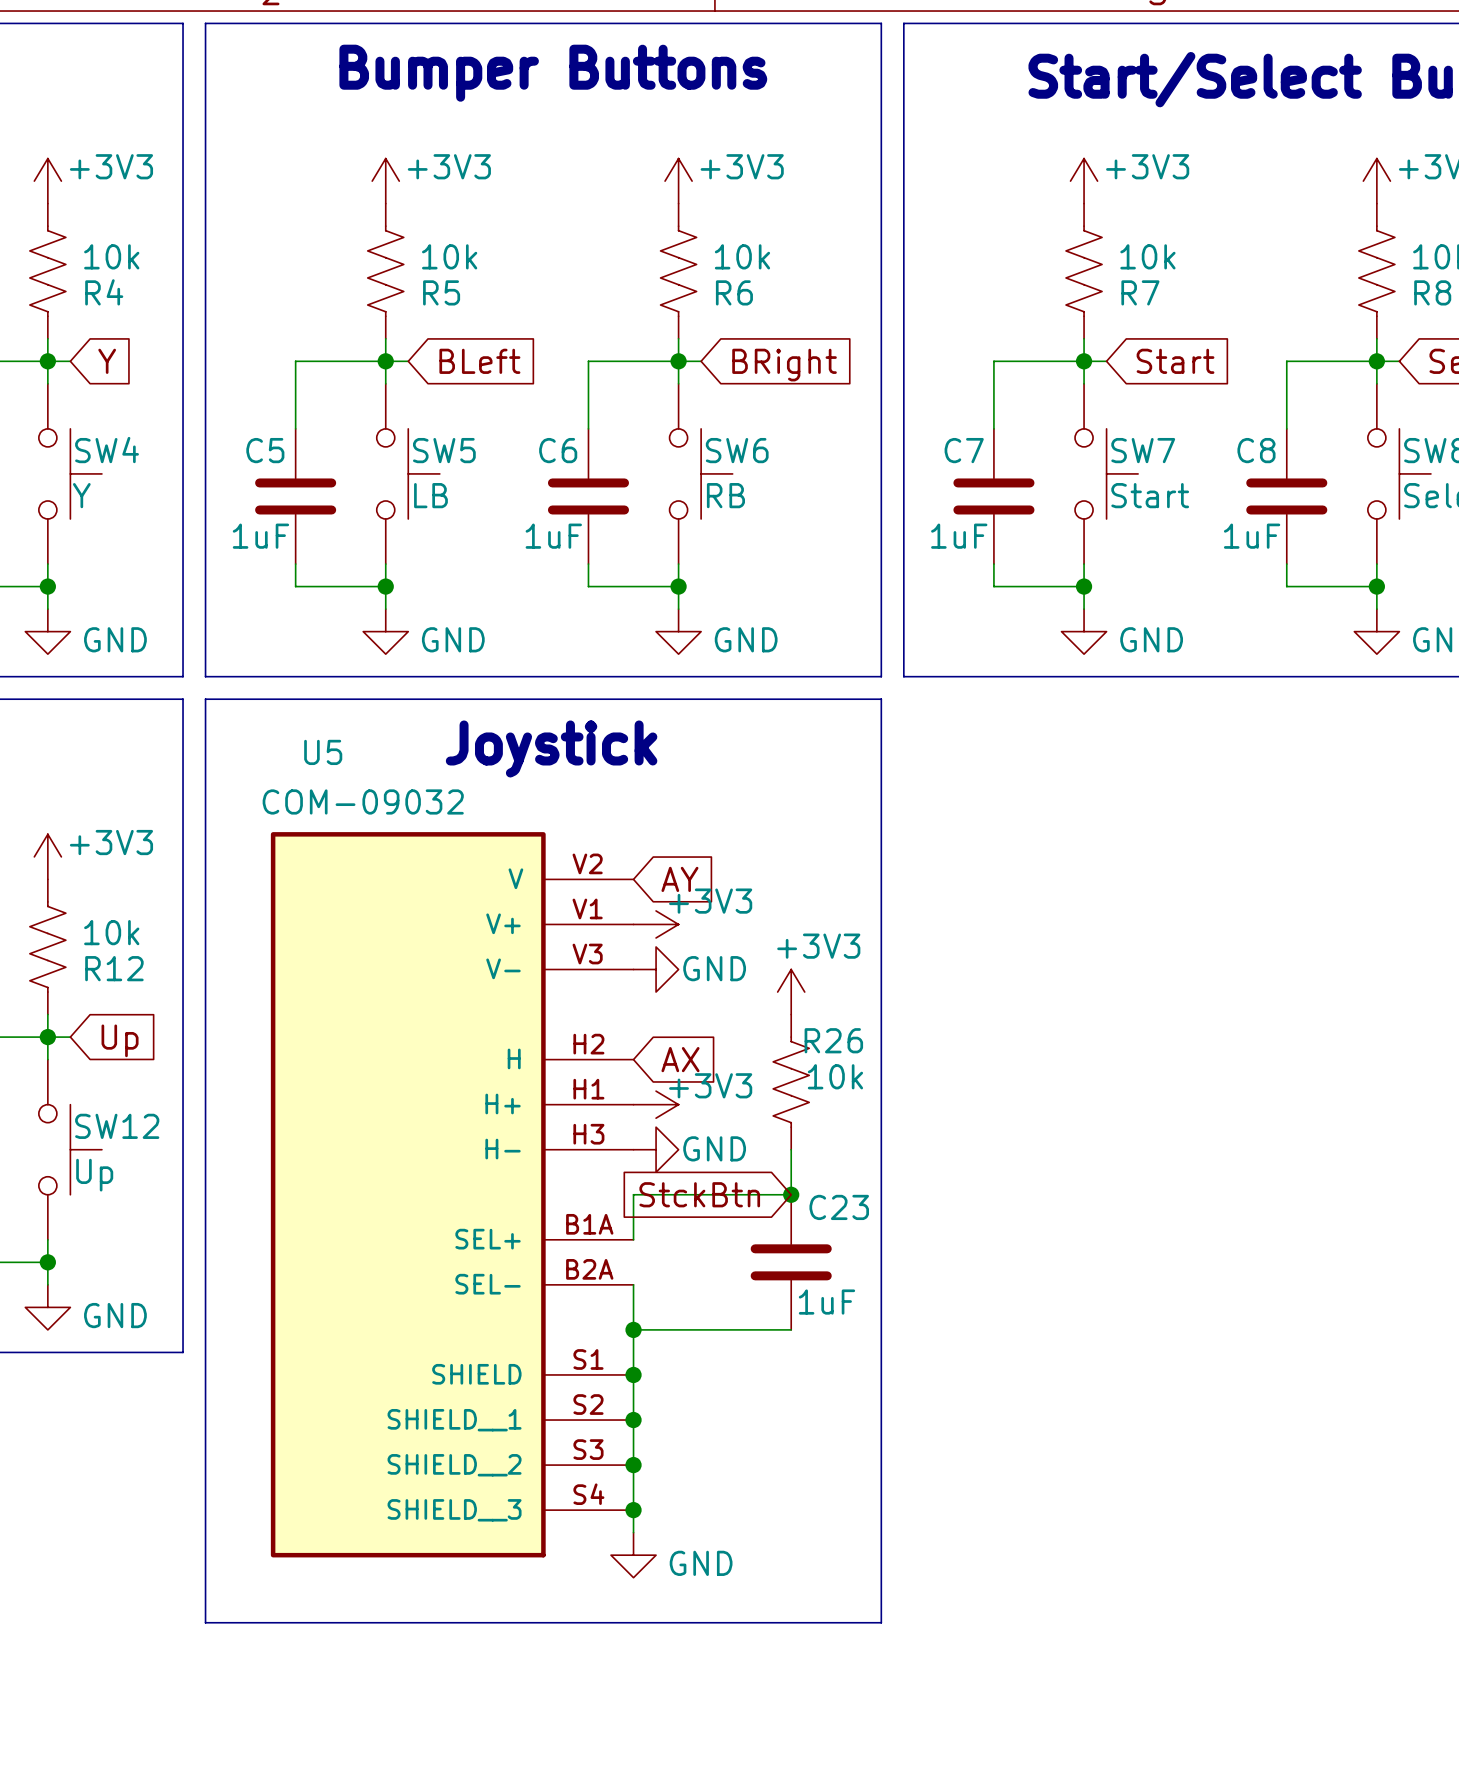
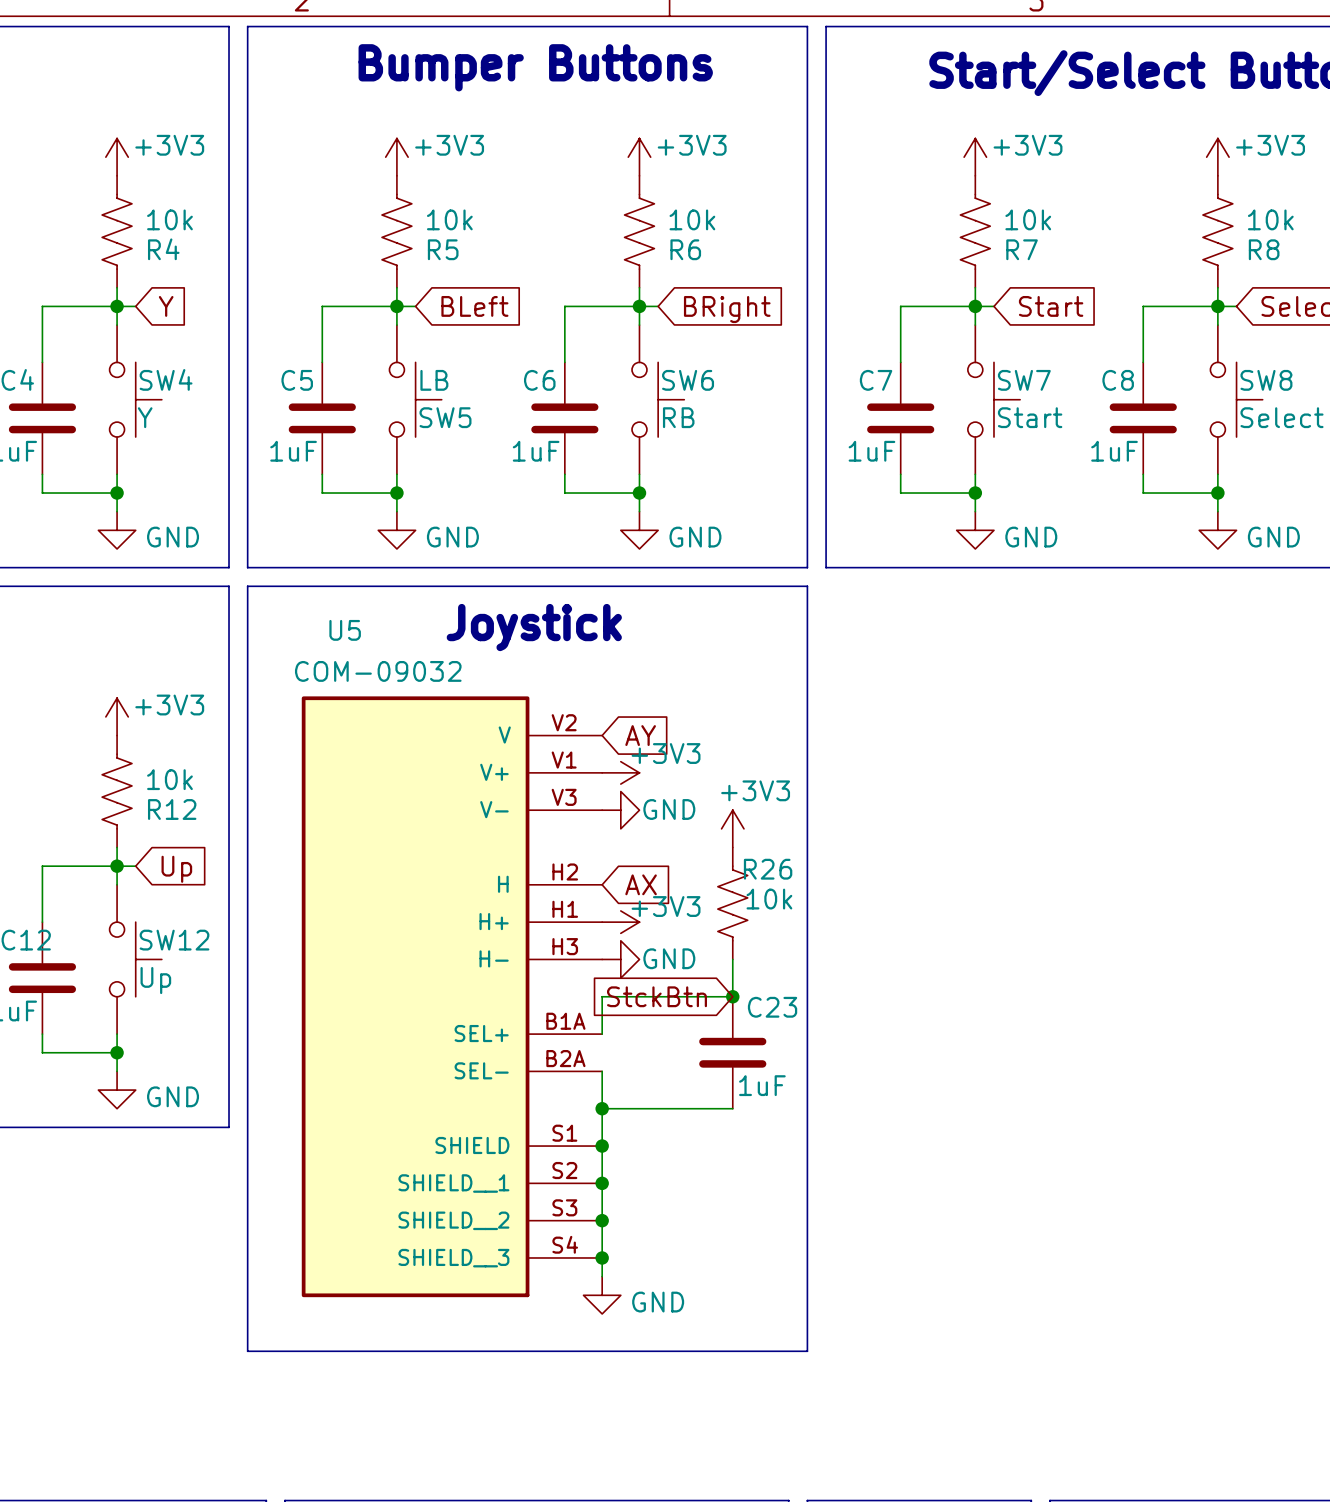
SW5 name position: SW5 (444, 450) -> SW5 (445, 417)
SW5 value position: LB (430, 495) -> LB (434, 380)

